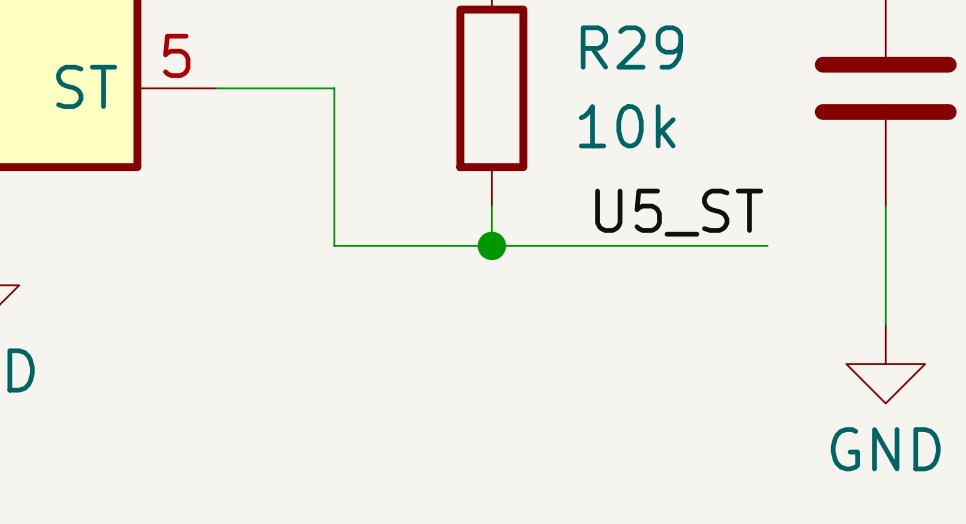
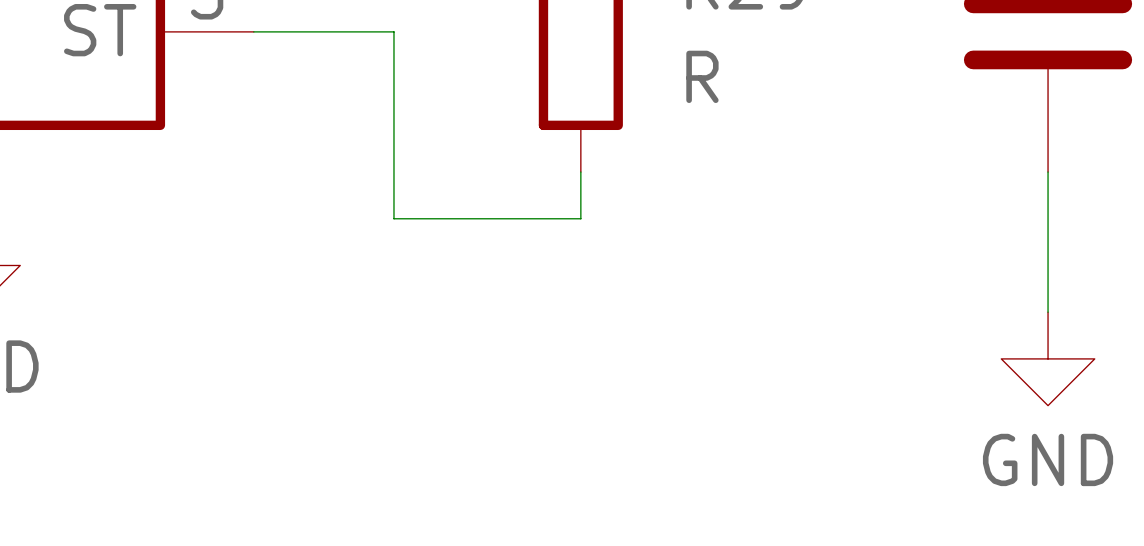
R29 value: 10k (627, 126) -> R (702, 76)
label: U5_ST (679, 212) -> none
wire: (491, 245) (767, 245) -> none
junction: (491, 245) -> none

